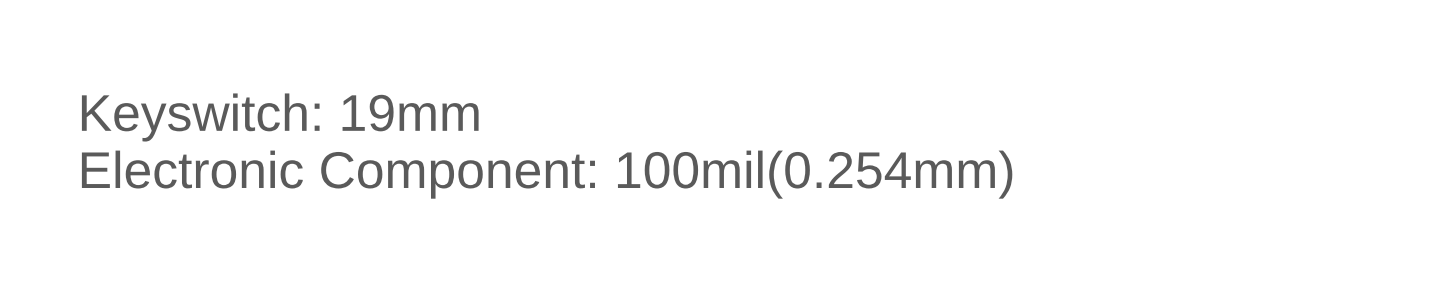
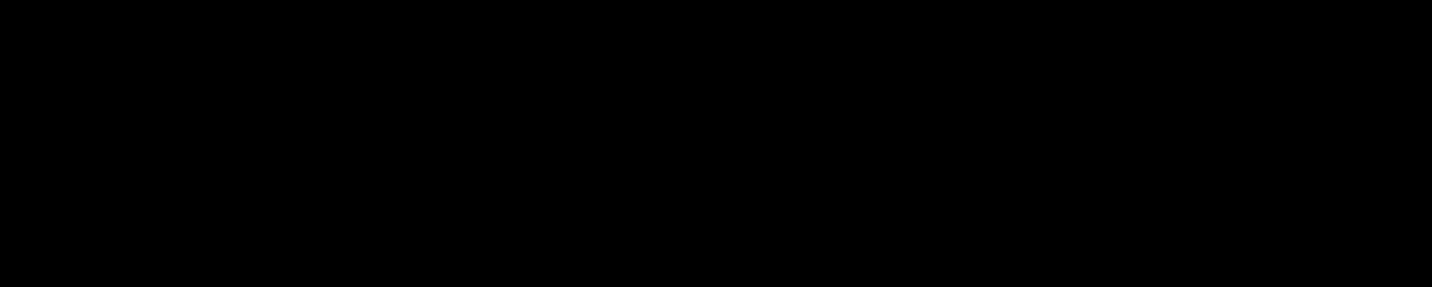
text: Keyswitch: 19mm (280, 117) -> none
text: Electronic Component: 100mil(0.254mm) (547, 174) -> none

